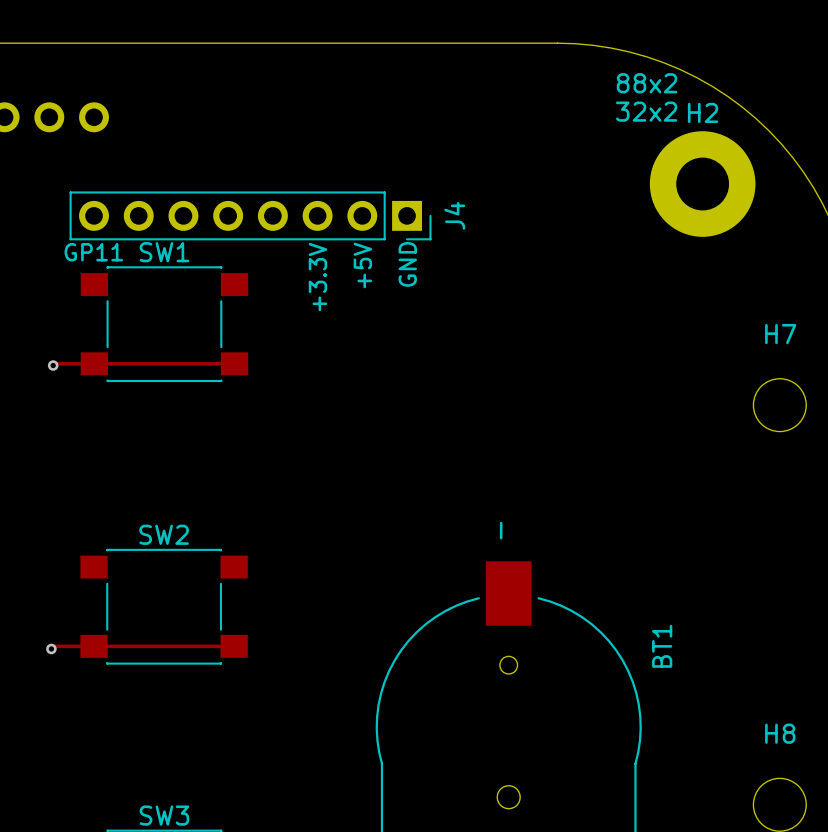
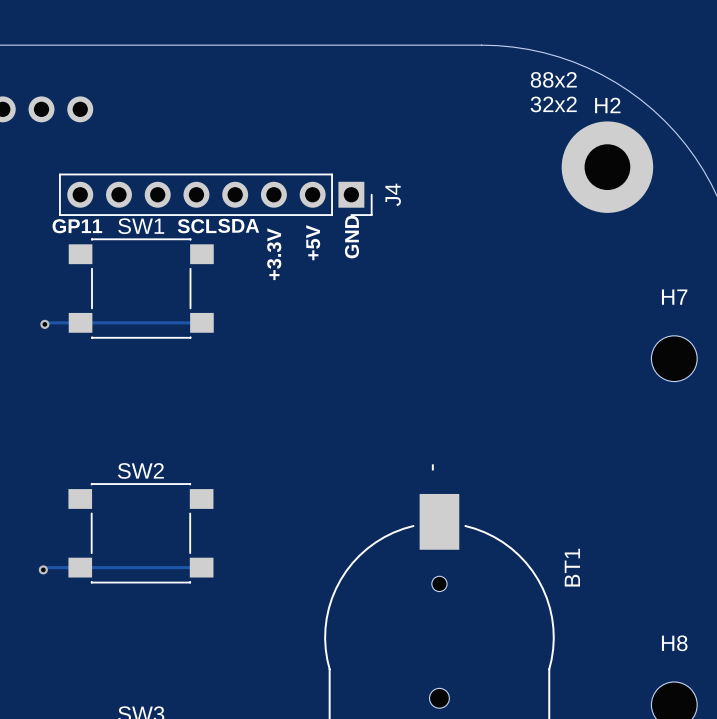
text: none -> SDA (238, 225)
text: none -> SCL (197, 226)

